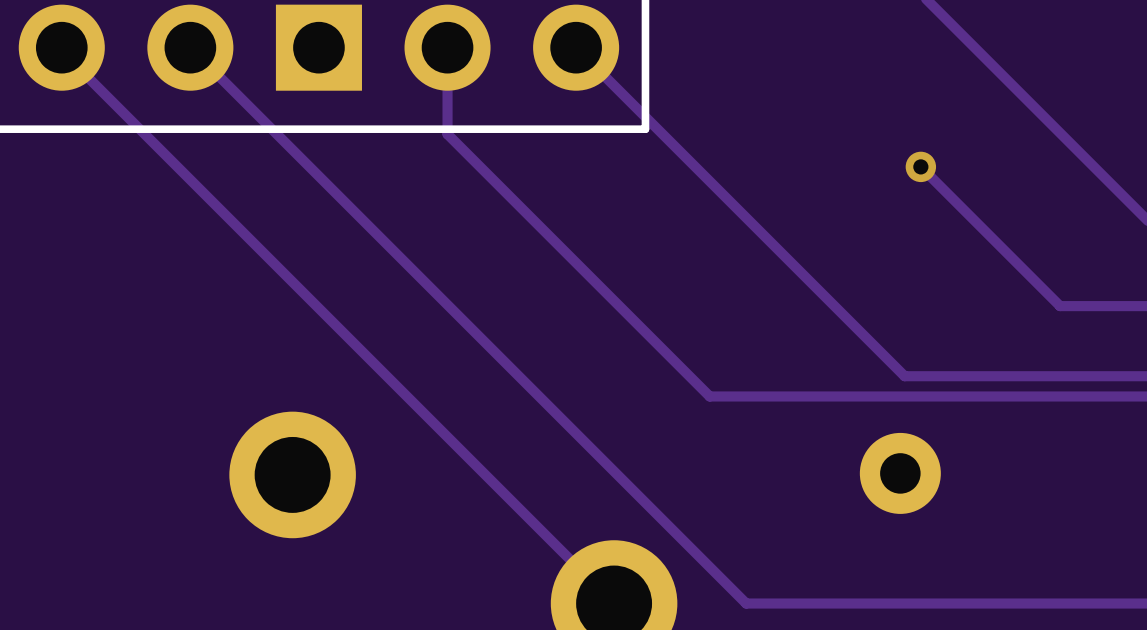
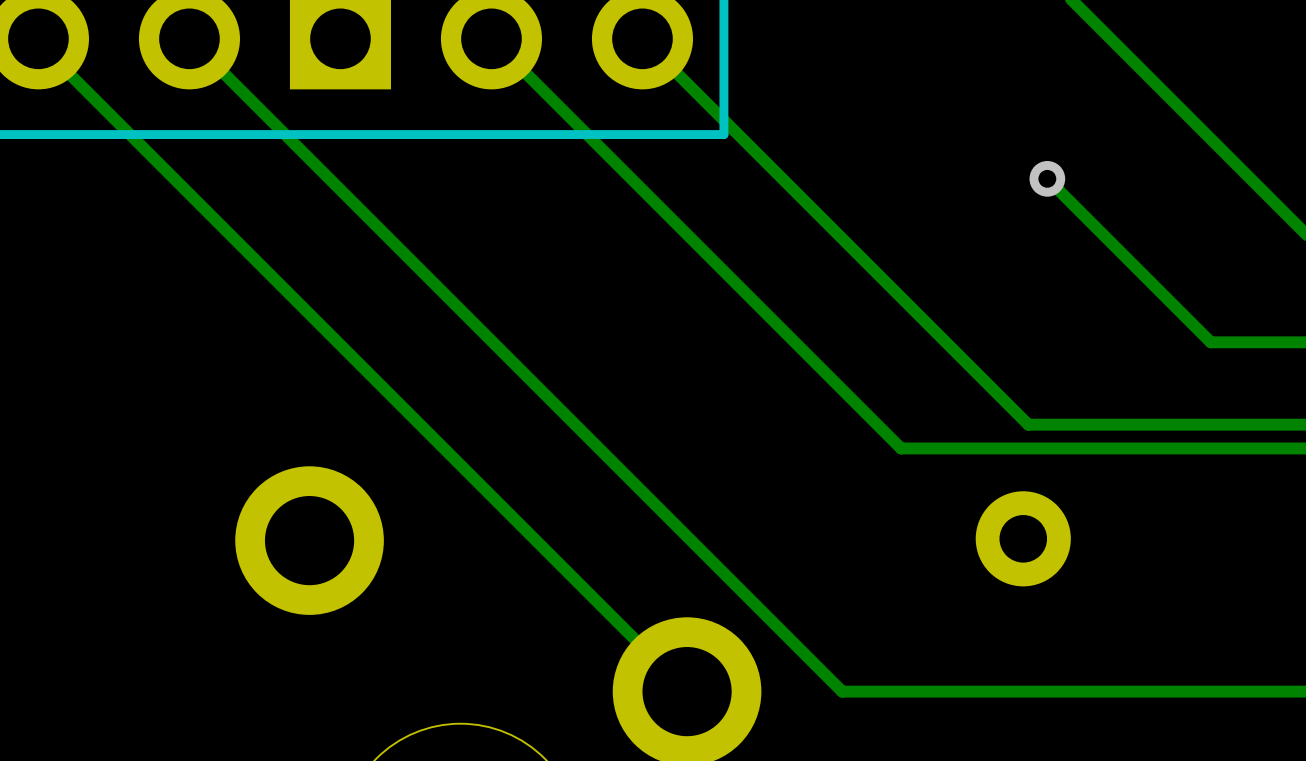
track: (447, 47) (447, 134) (709, 396) (796, 396) -> (491, 38) (901, 448)

